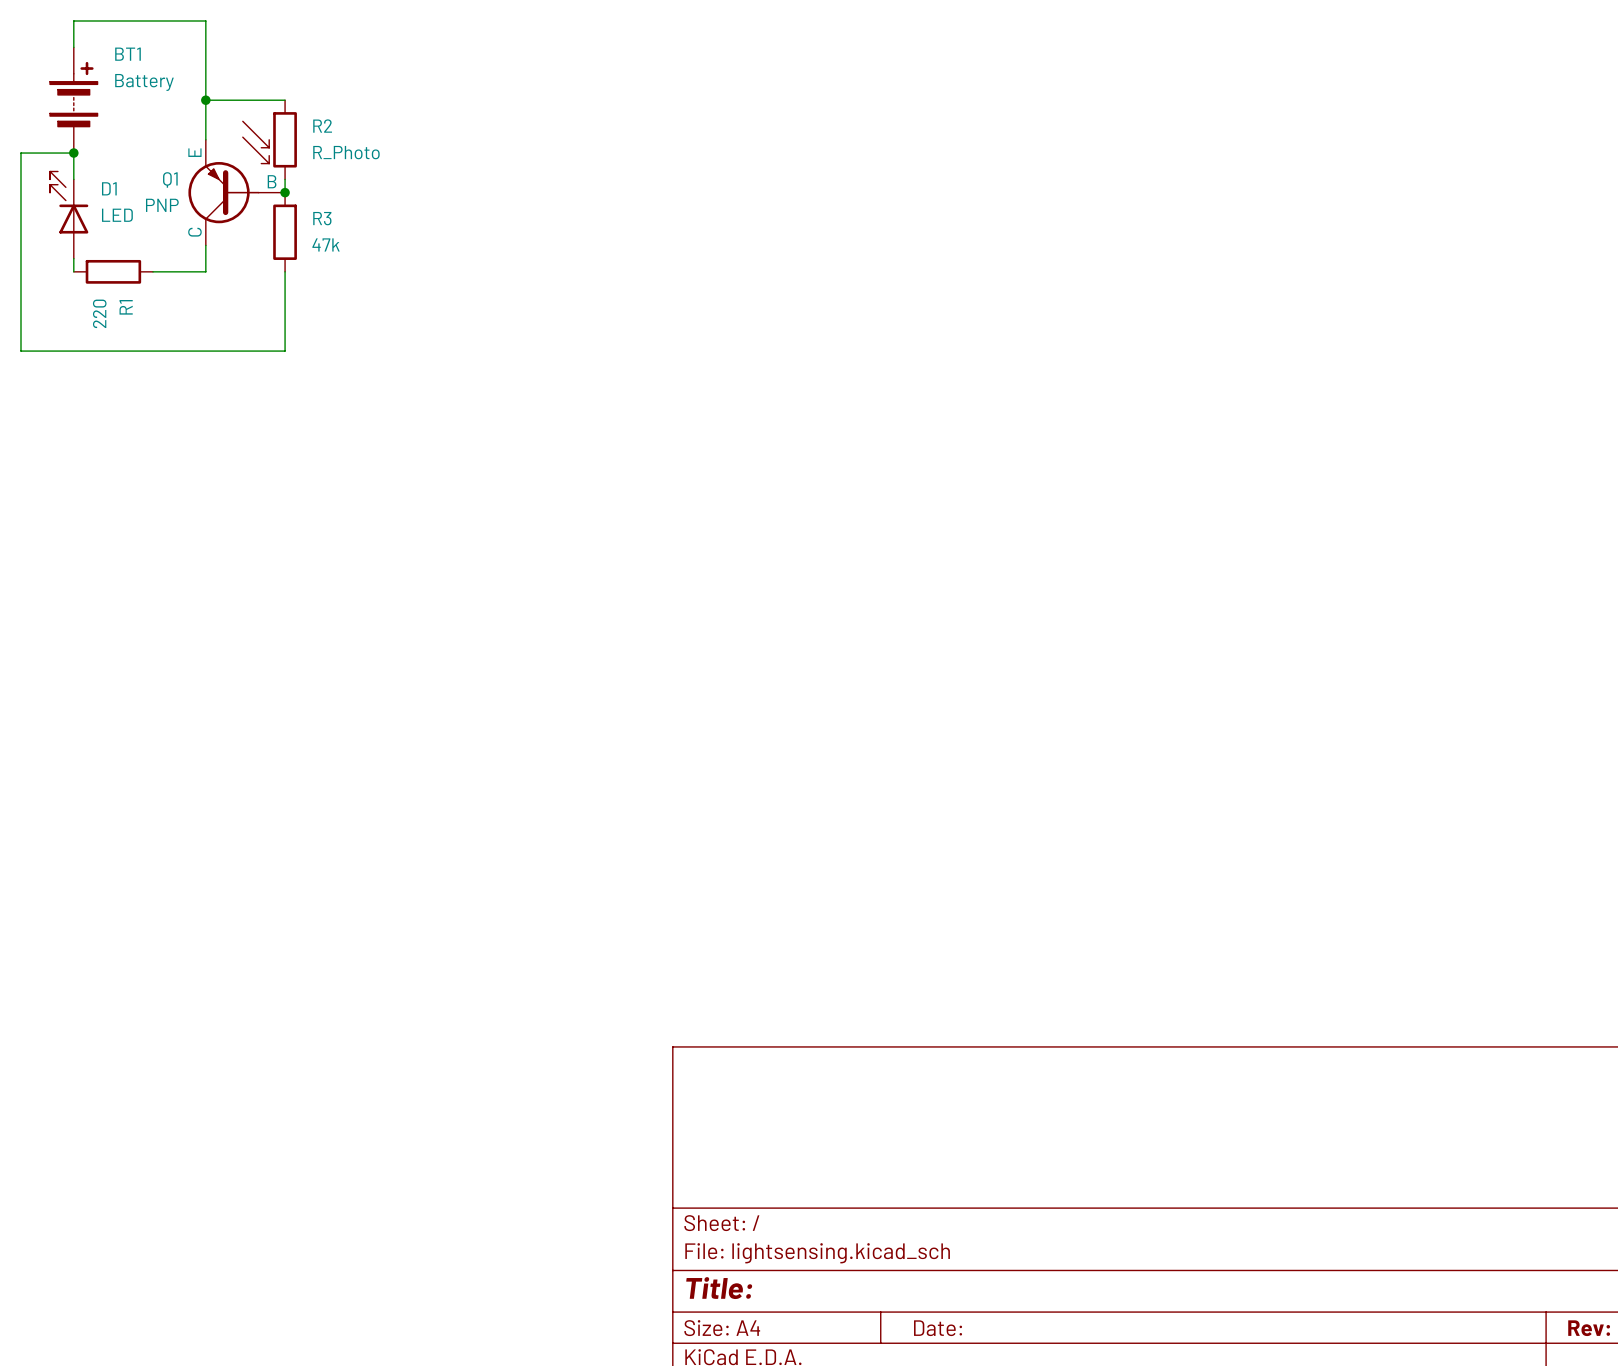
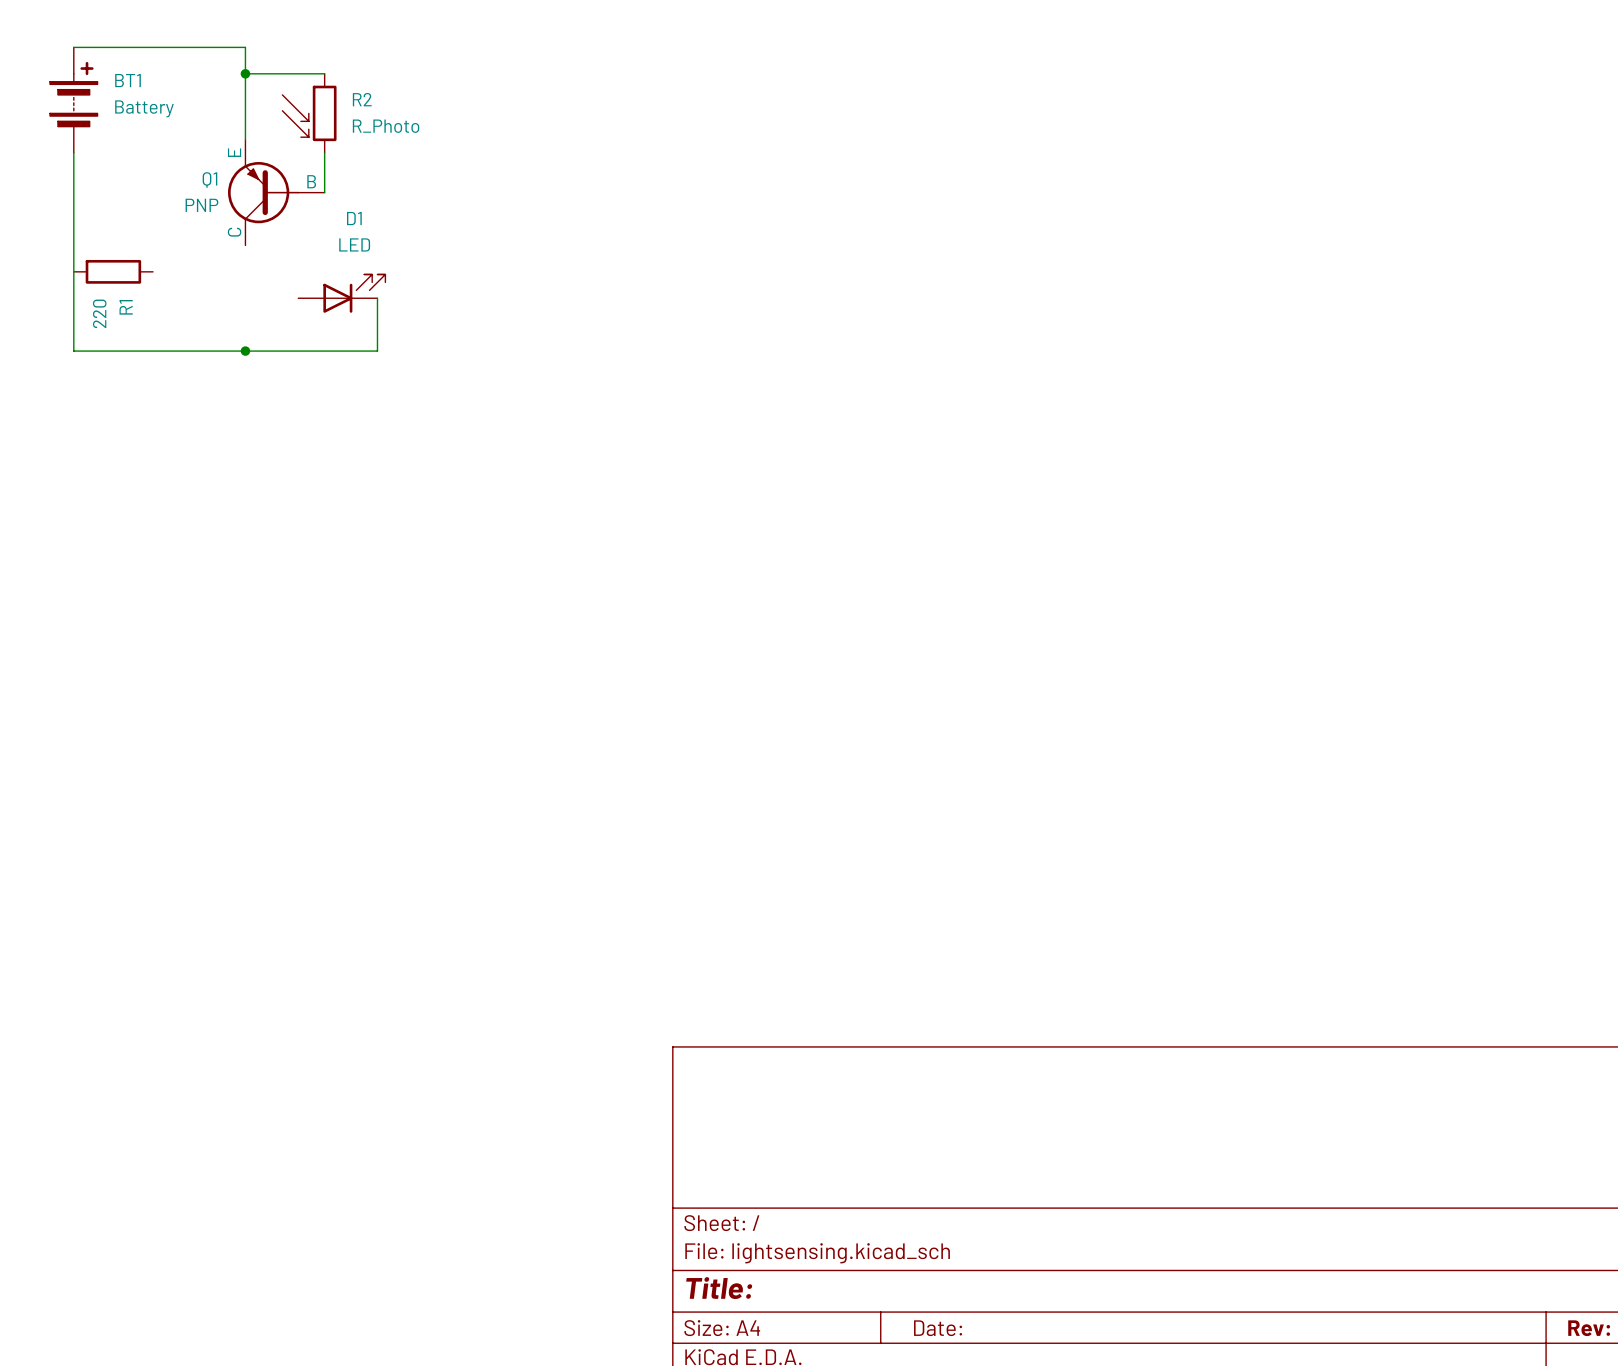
wire: (73, 47) (73, 20) (205, 20) (205, 139) -> (73, 47) (245, 47) (245, 139)
BT1 name position: BT1 (128, 54) -> BT1 (128, 80)
BT1 value position: Battery (144, 82) -> Battery (144, 108)
wire: (205, 100) (285, 100) -> (245, 73) (324, 73)
junction position: (205, 100) -> (245, 73)
R2 position: (269, 139) -> (309, 113)
wire: (73, 153) (20, 153) (20, 351) (73, 351) -> (73, 271) (73, 351)
junction: (73, 153) -> none
wire: none -> (324, 153) (324, 192)
wire: (285, 179) (285, 192) -> none
D1 name position: D1 (109, 188) -> D1 (354, 218)
Q1 position: (236, 192) -> (276, 192)
junction: (285, 192) -> none
D1 rotation: 0° (69, 202) -> 90° clockwise (354, 293)
D1 position: (69, 215) -> (341, 293)
D1 value position: LED (117, 215) -> LED (354, 244)
R3: 47k (285, 232) -> none
wire: (205, 245) (205, 271) (153, 271) -> none
wire: (285, 271) (285, 351) -> (377, 298) (377, 351) (285, 351)
junction: none -> (245, 351)

